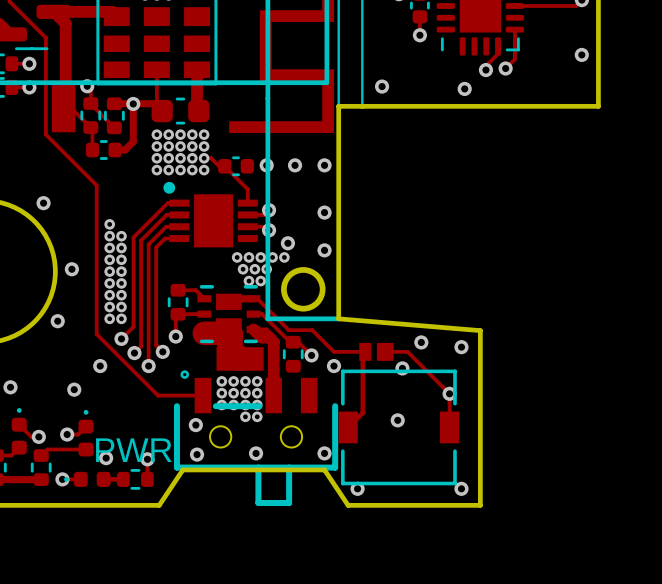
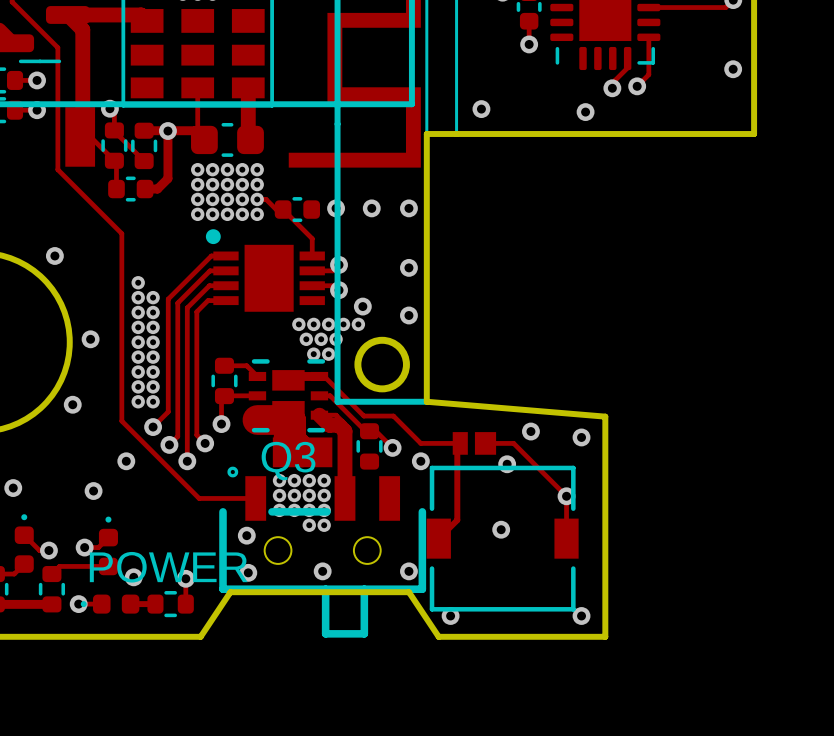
Q3 name: none -> Q3 (288, 461)
part value: PWR (133, 450) -> POWER (168, 567)

